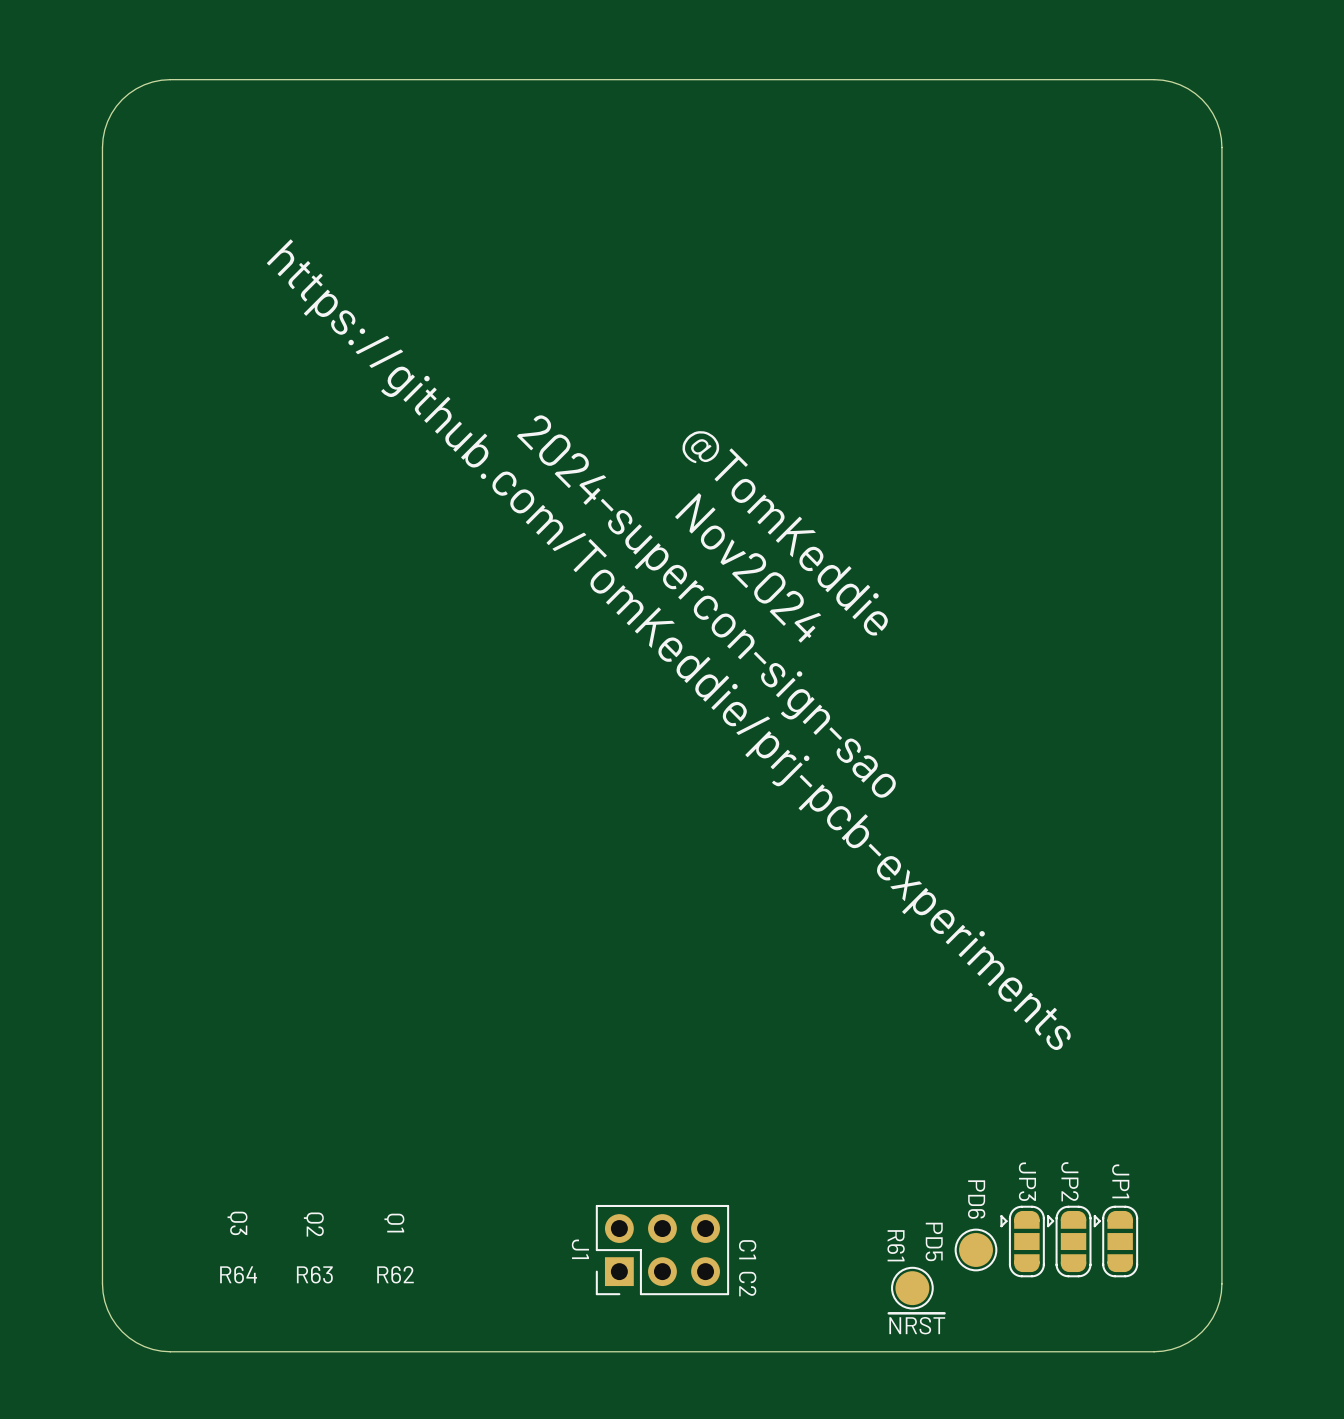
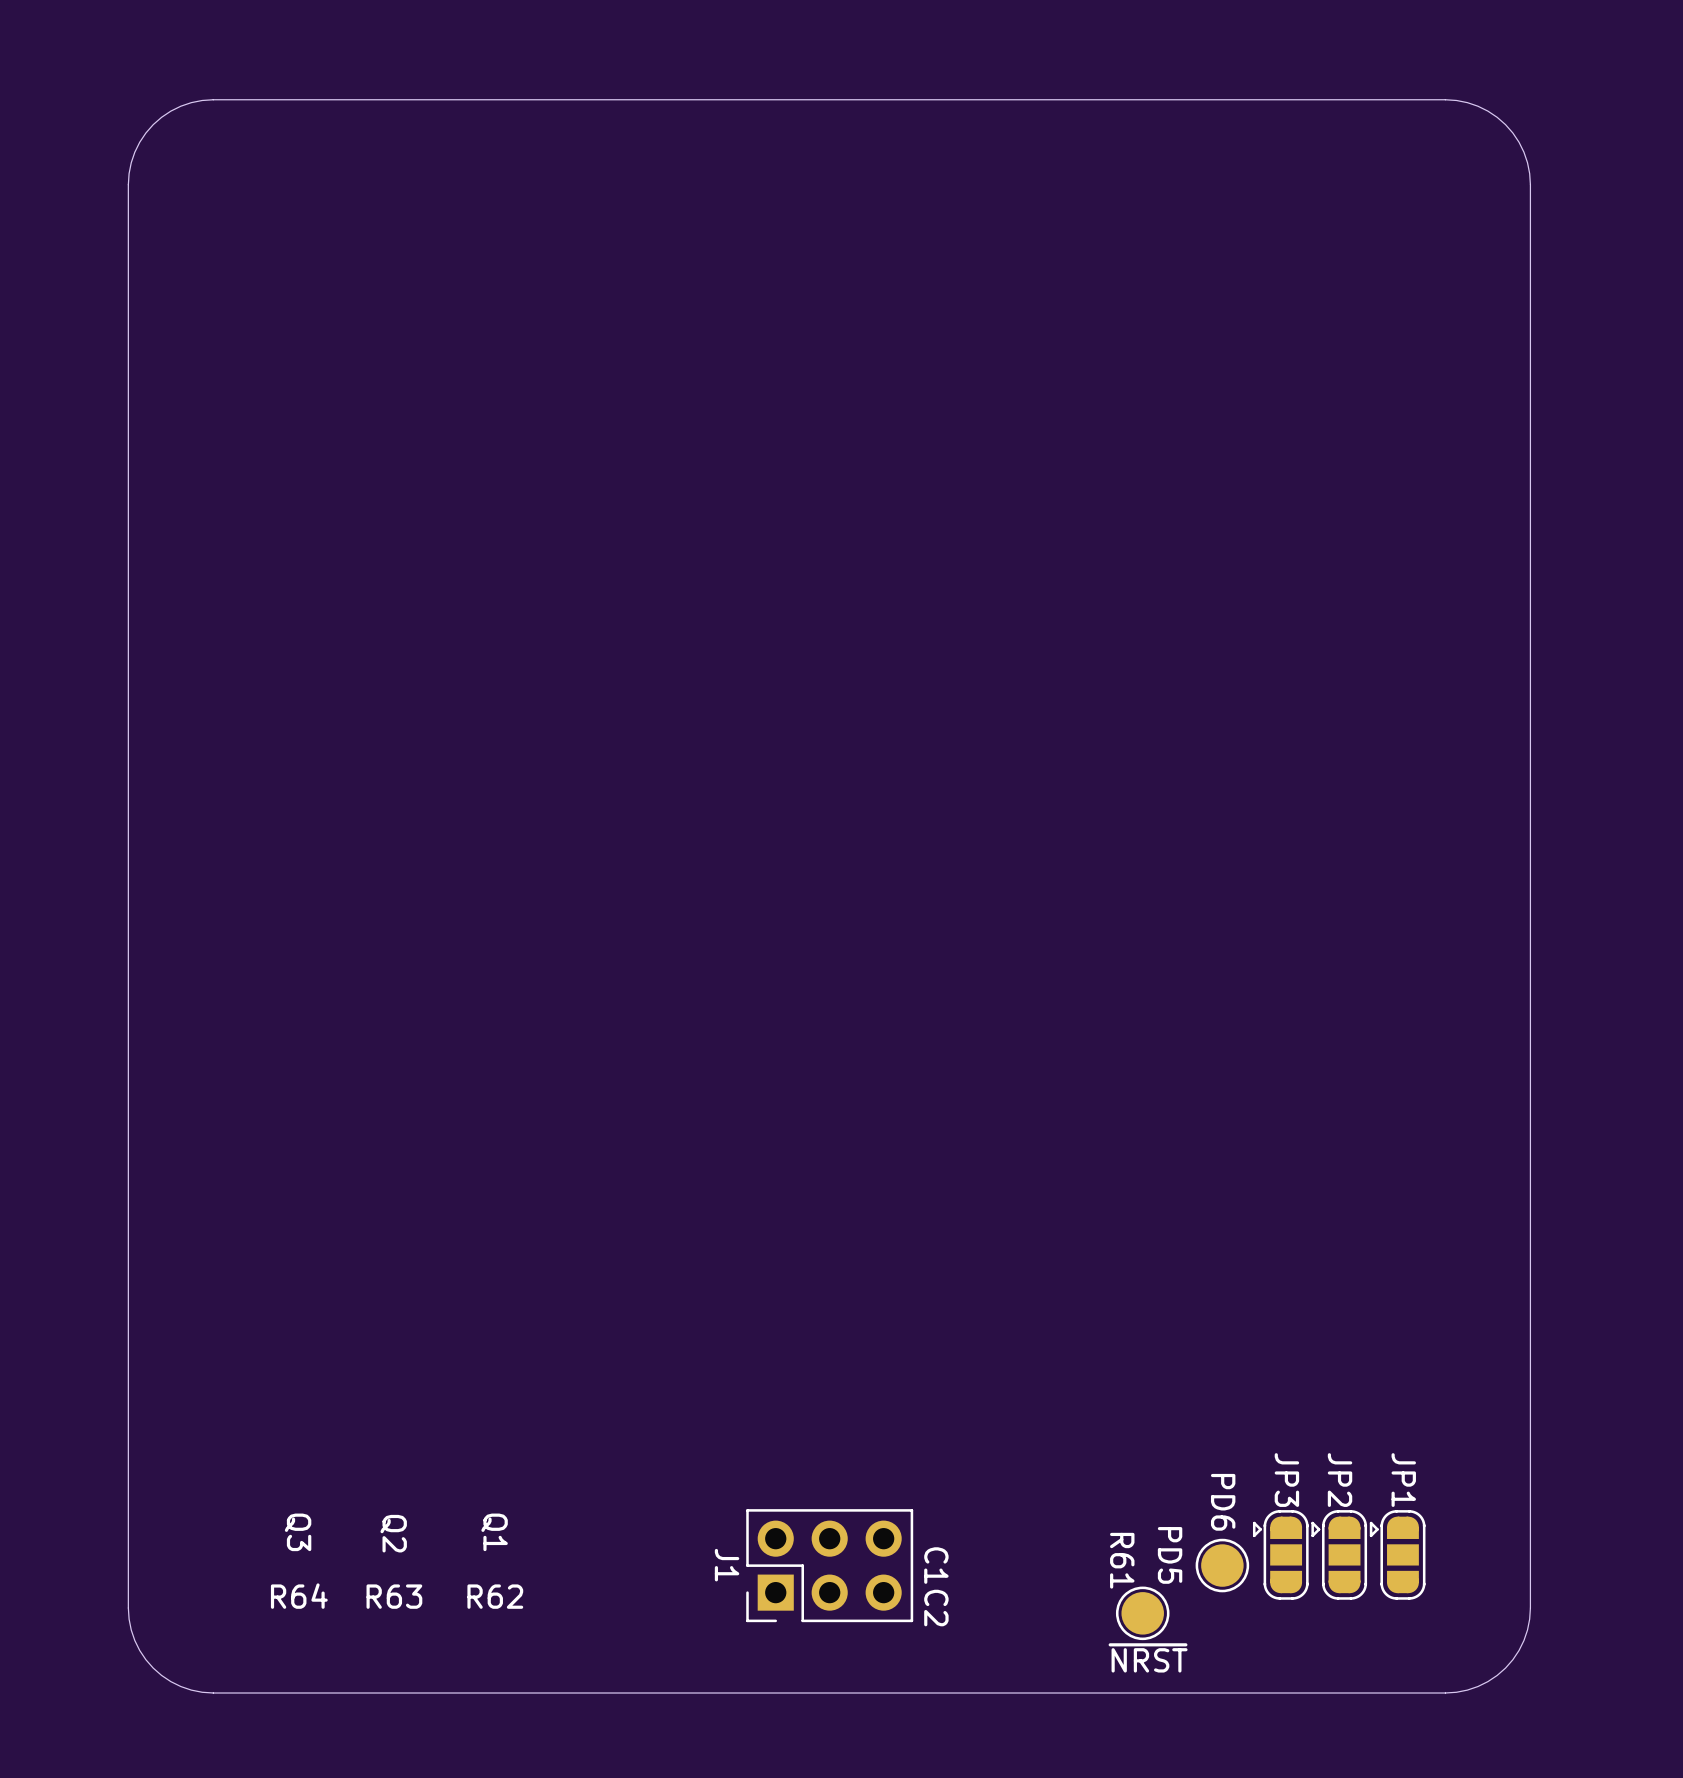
text: @TomKeddie (784, 533) -> none
text: Nov2024 (748, 567) -> none
text: 2024-supercon-sign-sao (706, 606) -> none
text: https://github.com/TomKeddie/prj-pcb-experiments (668, 644) -> none

